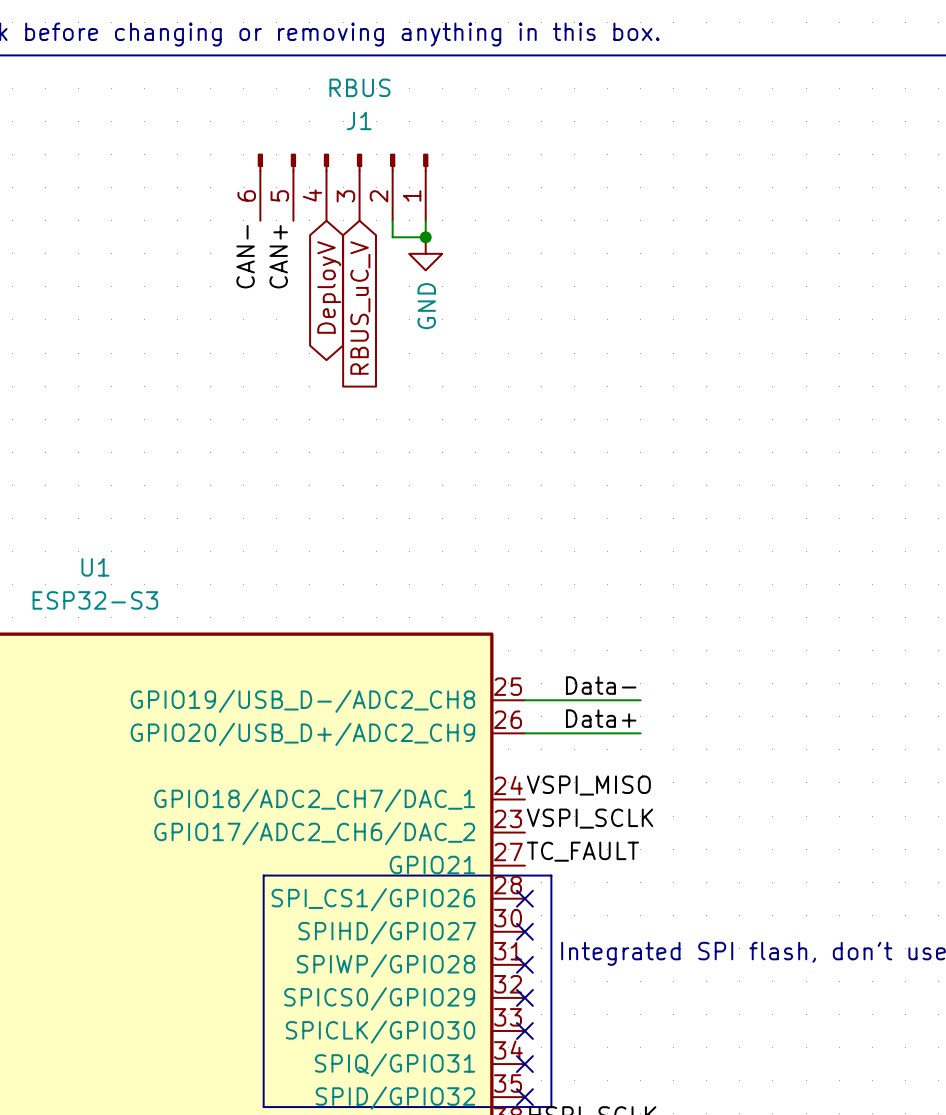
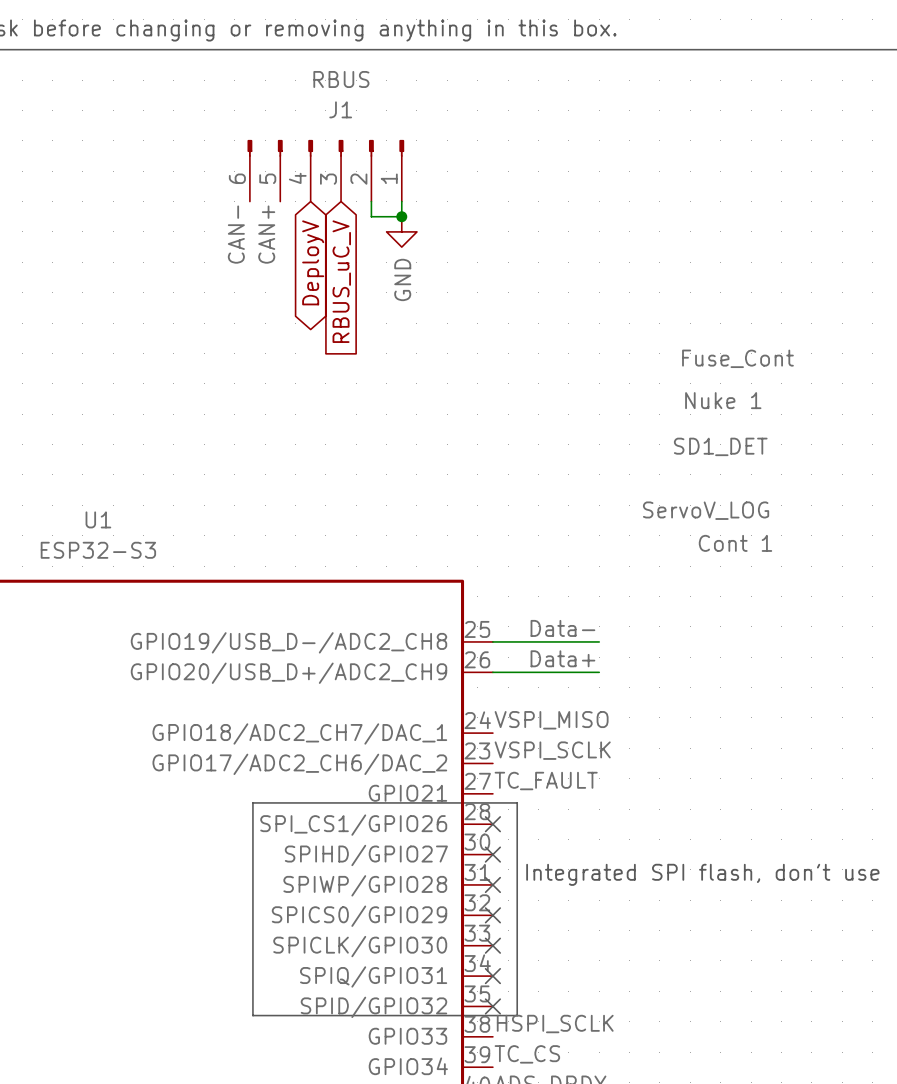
label: none -> Fuse_Cont (737, 358)
label: none -> Nuke 1 (723, 400)
label: none -> SD1_DET (720, 446)
label: none -> ServoV_LOG (706, 510)
label: none -> Cont 1 (735, 543)

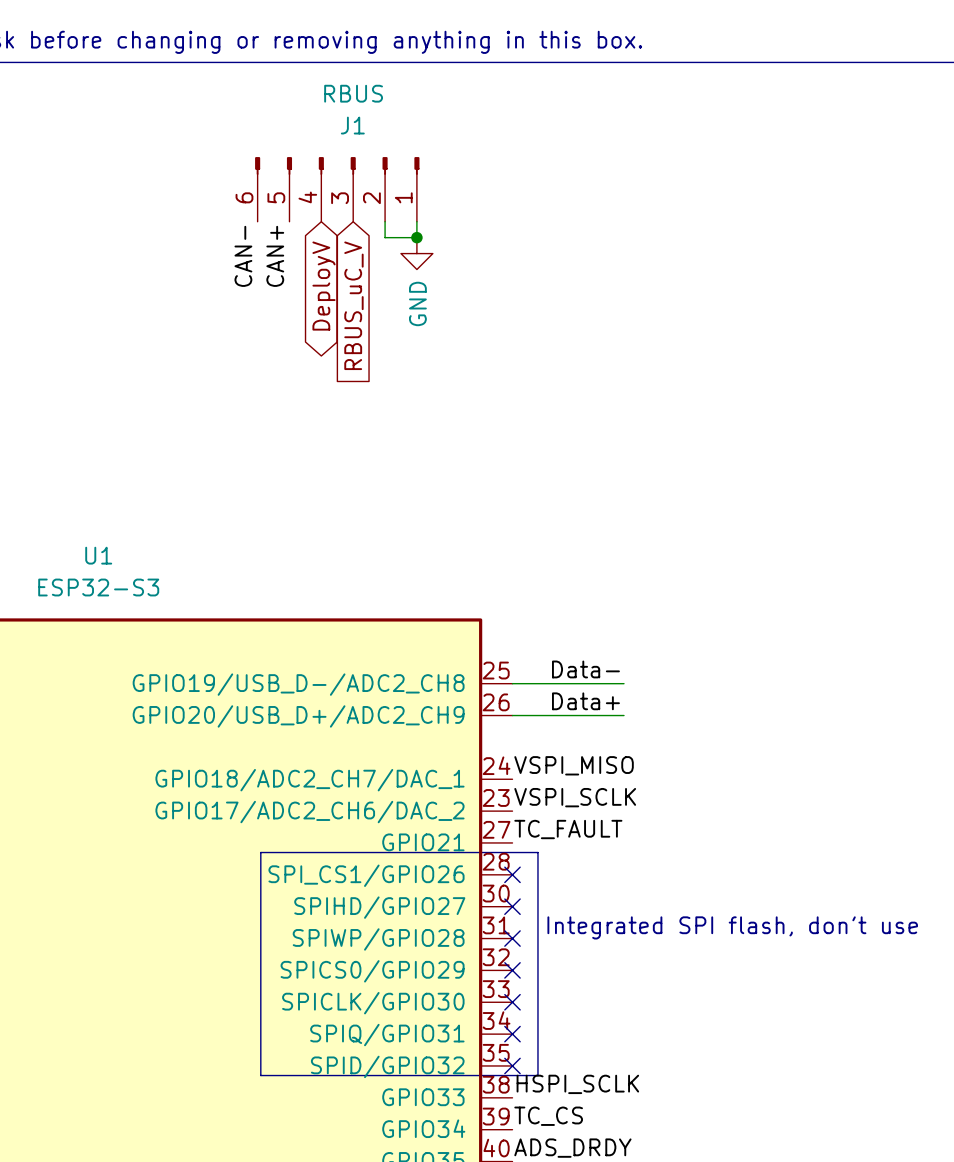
label: Fuse_Cont (737, 358) -> none
label: Nuke 1 (723, 400) -> none
label: SD1_DET (720, 446) -> none
label: ServoV_LOG (706, 510) -> none
label: Cont 1 (735, 543) -> none

